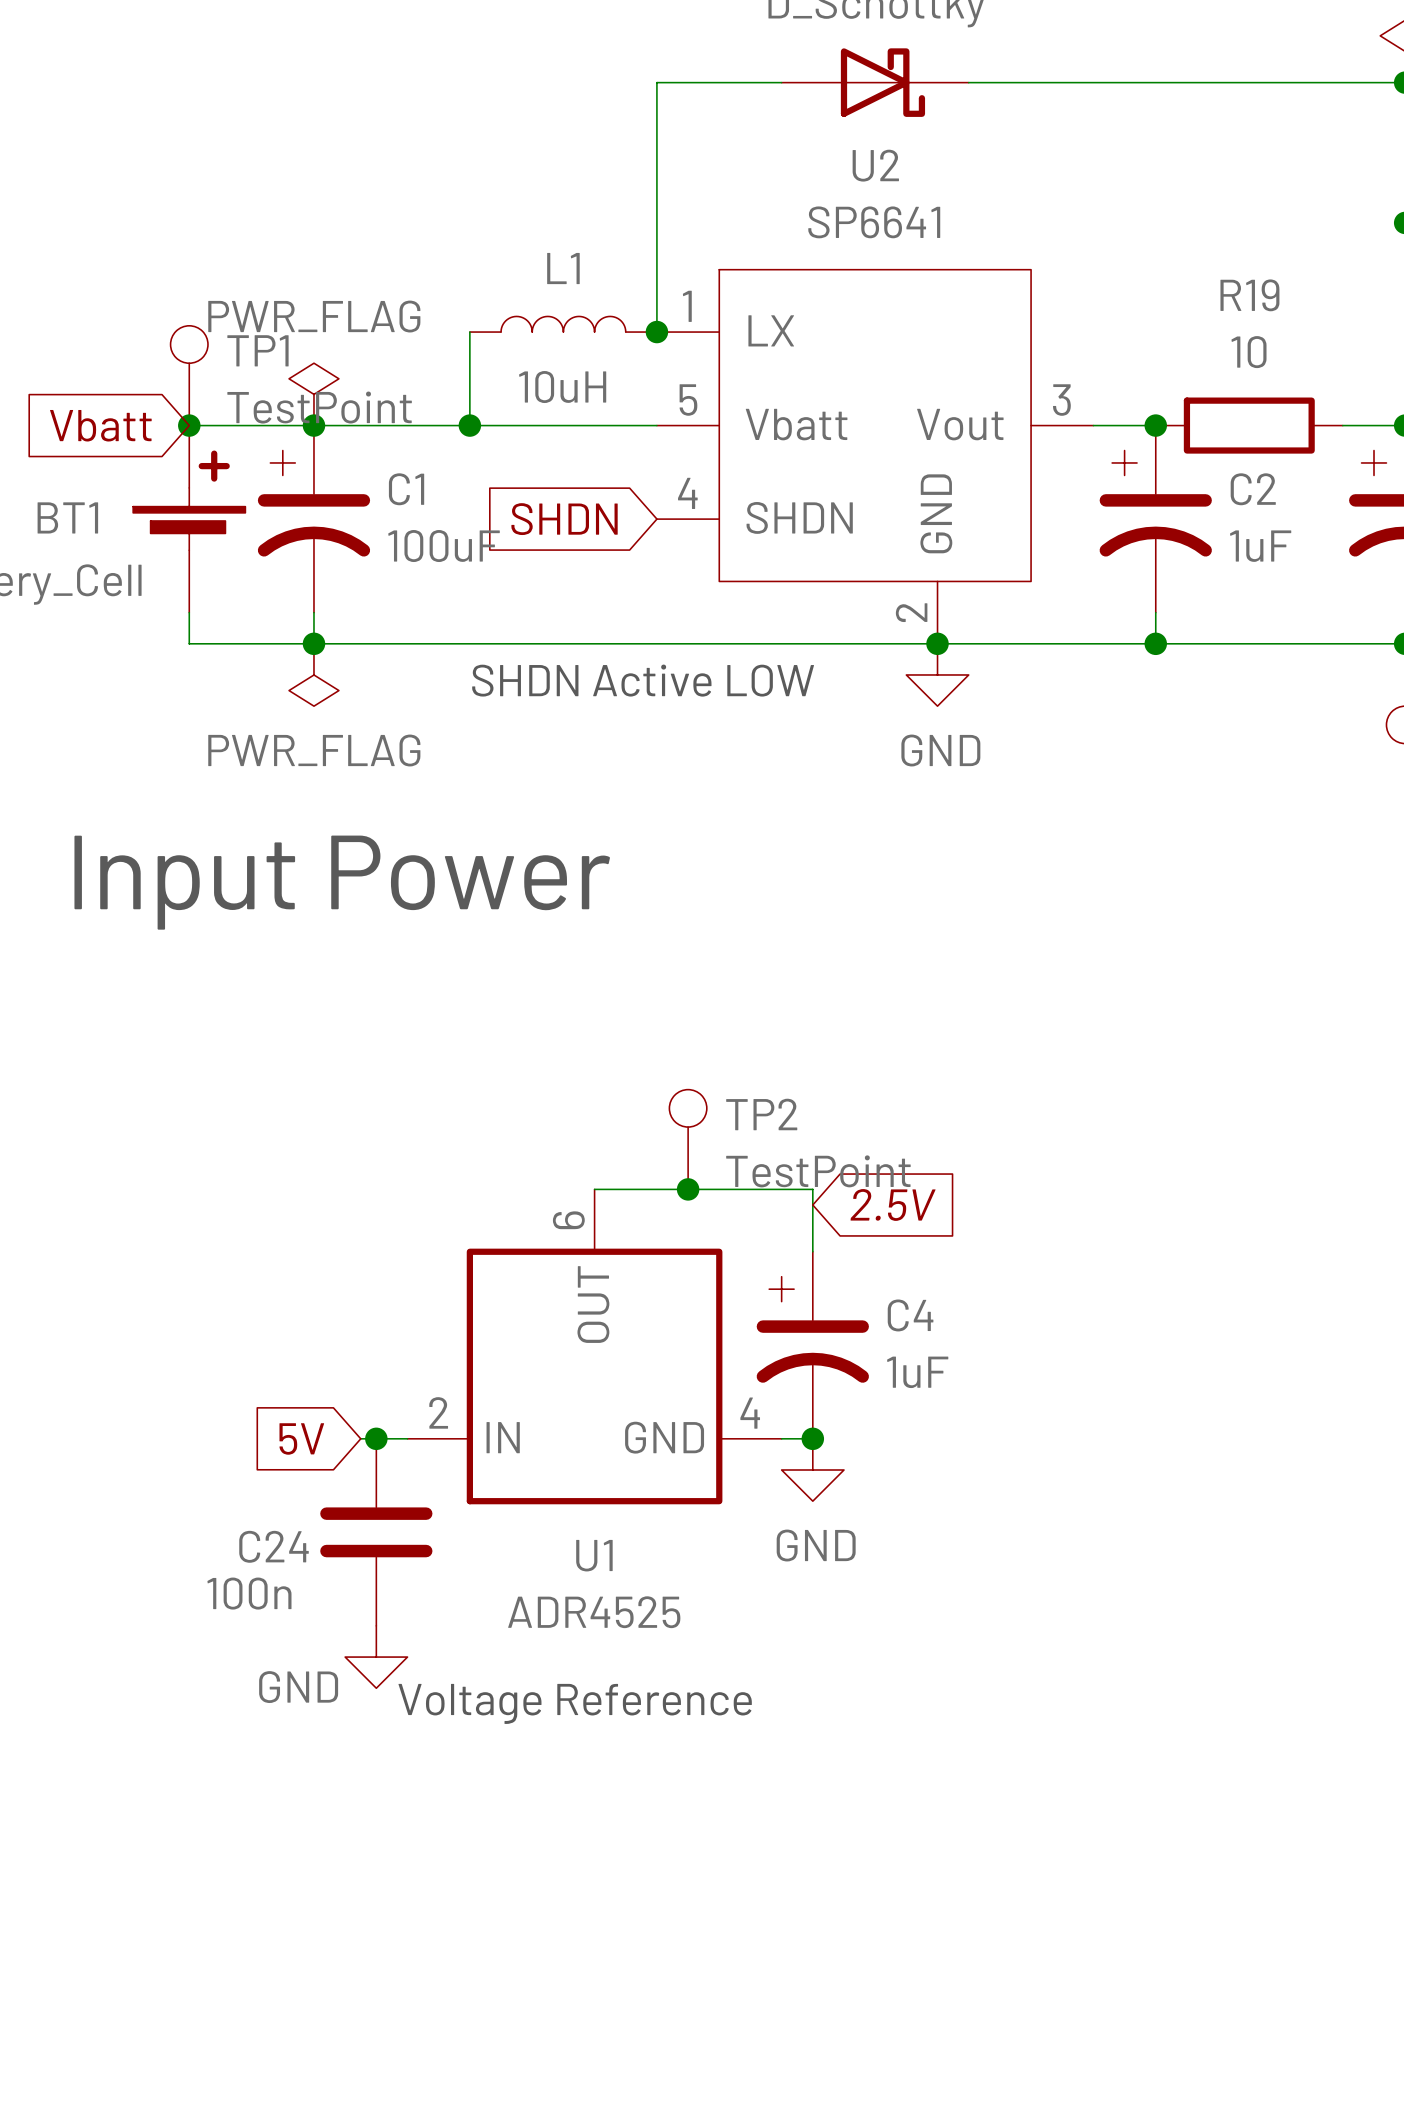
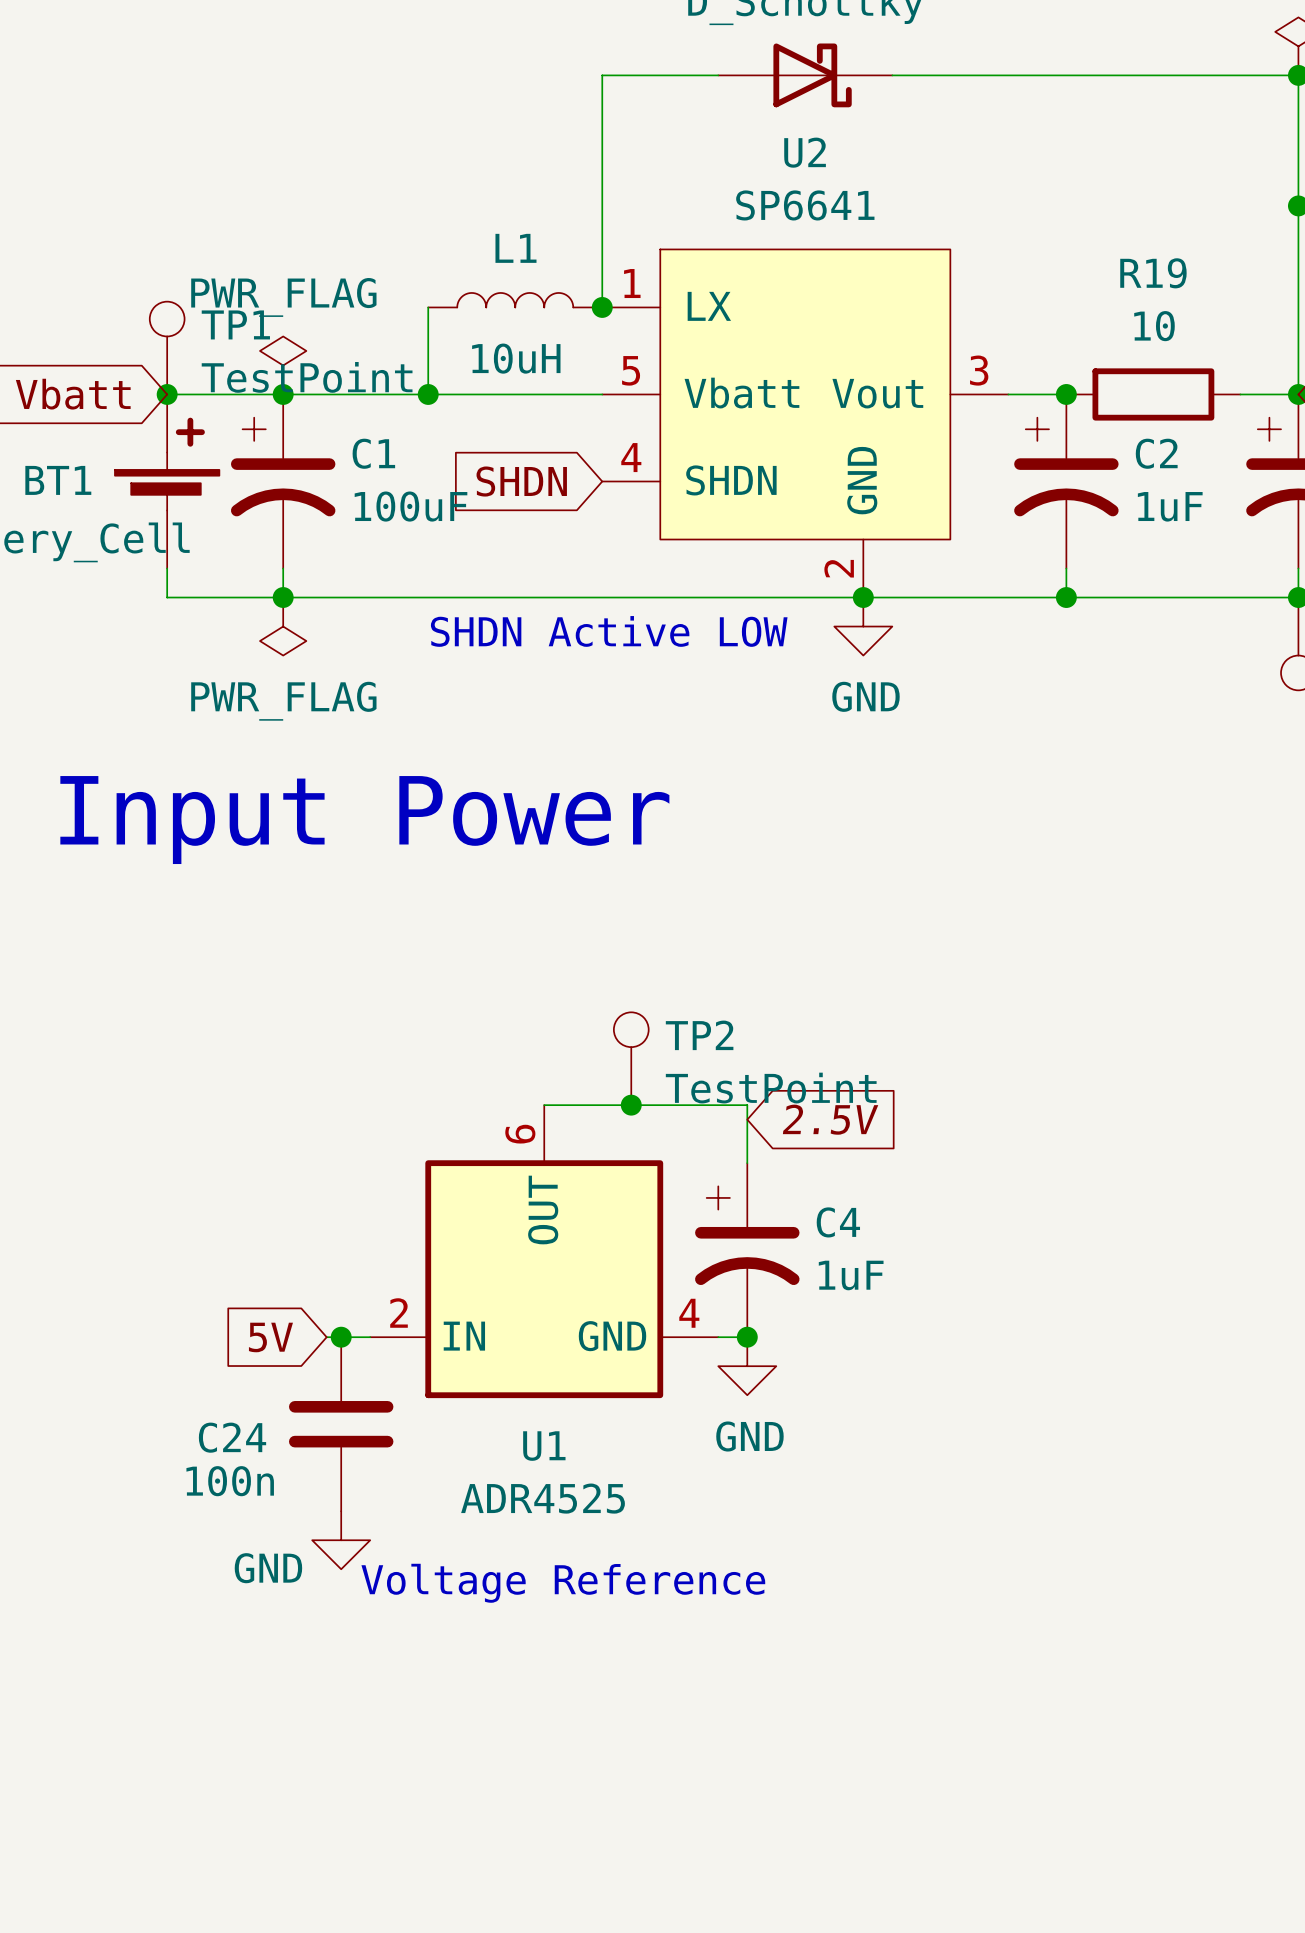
C24 name position: C24 (274, 1546) -> C24 (232, 1437)

